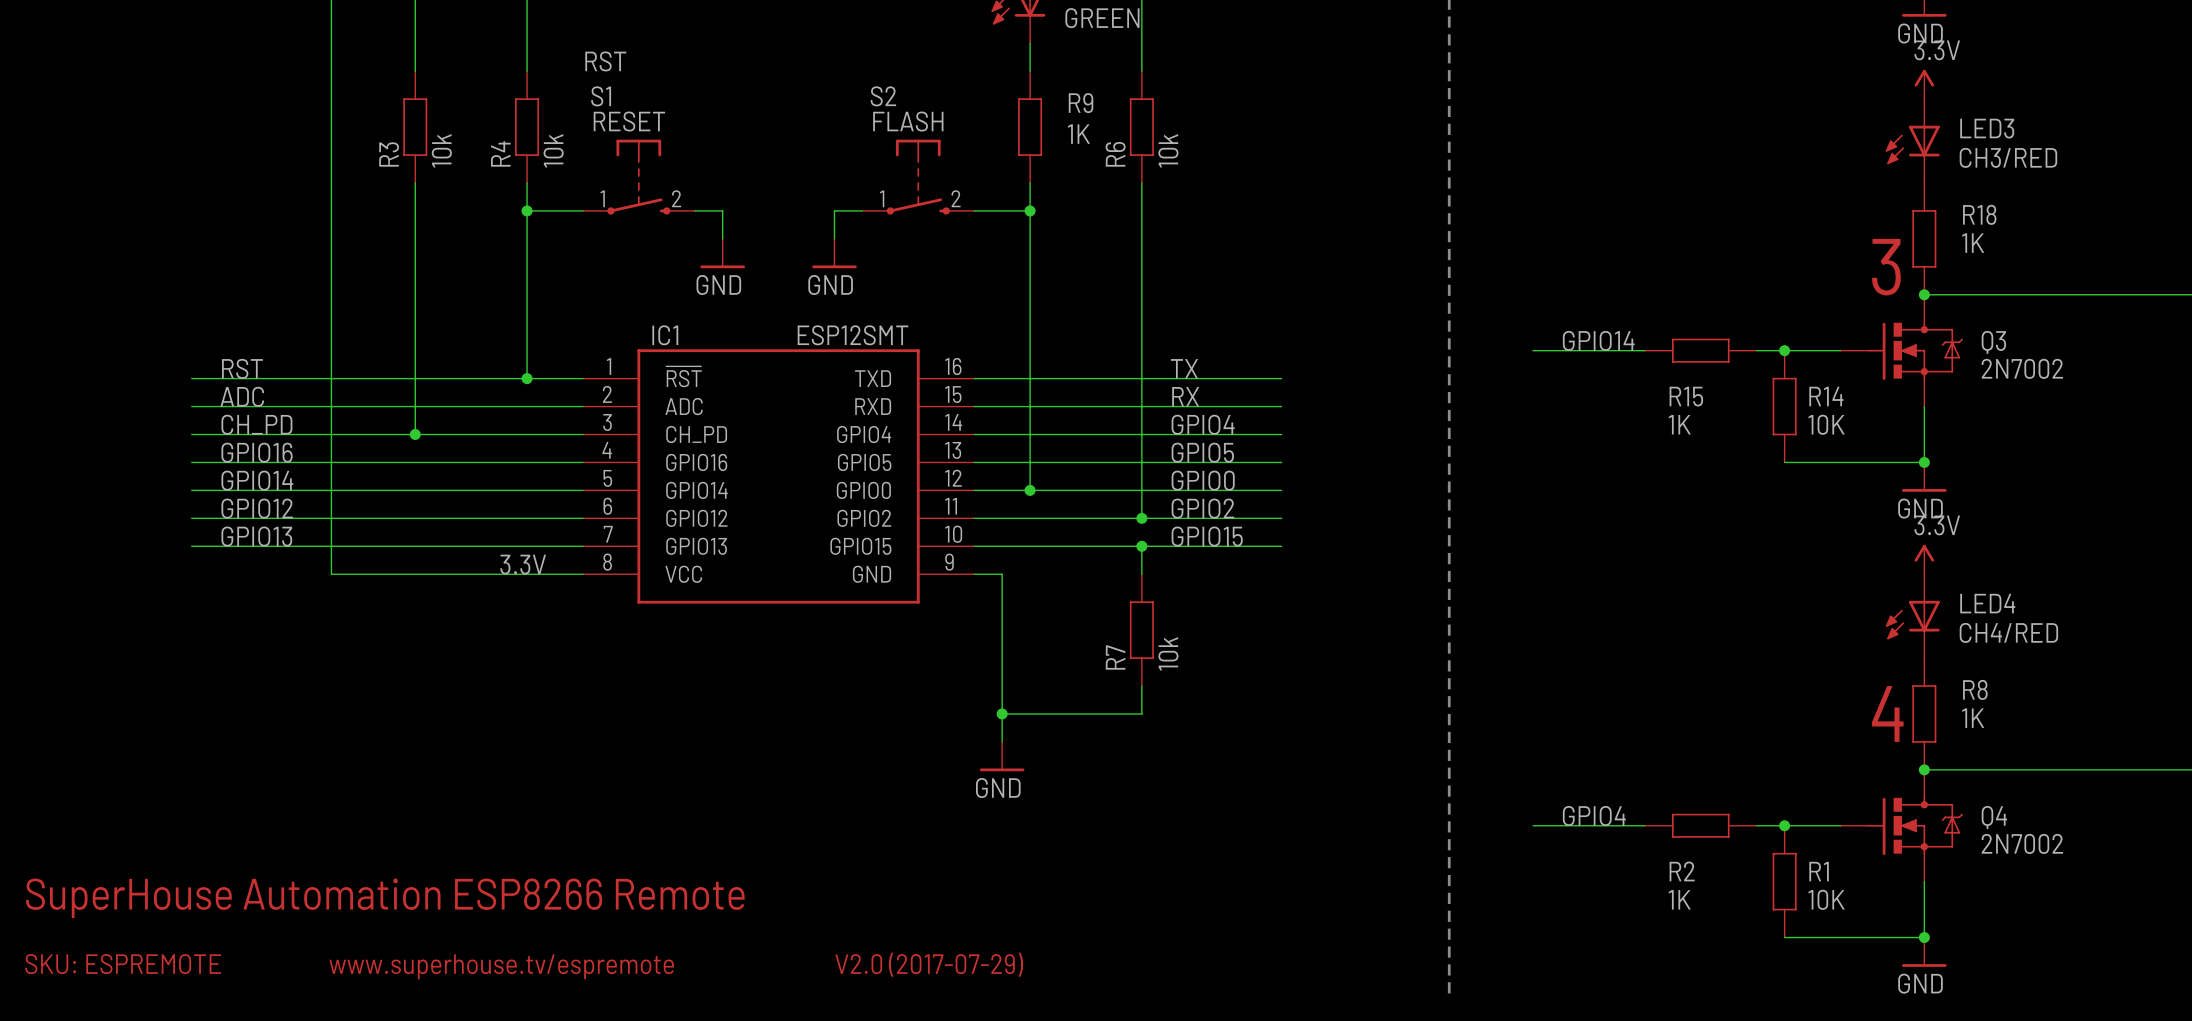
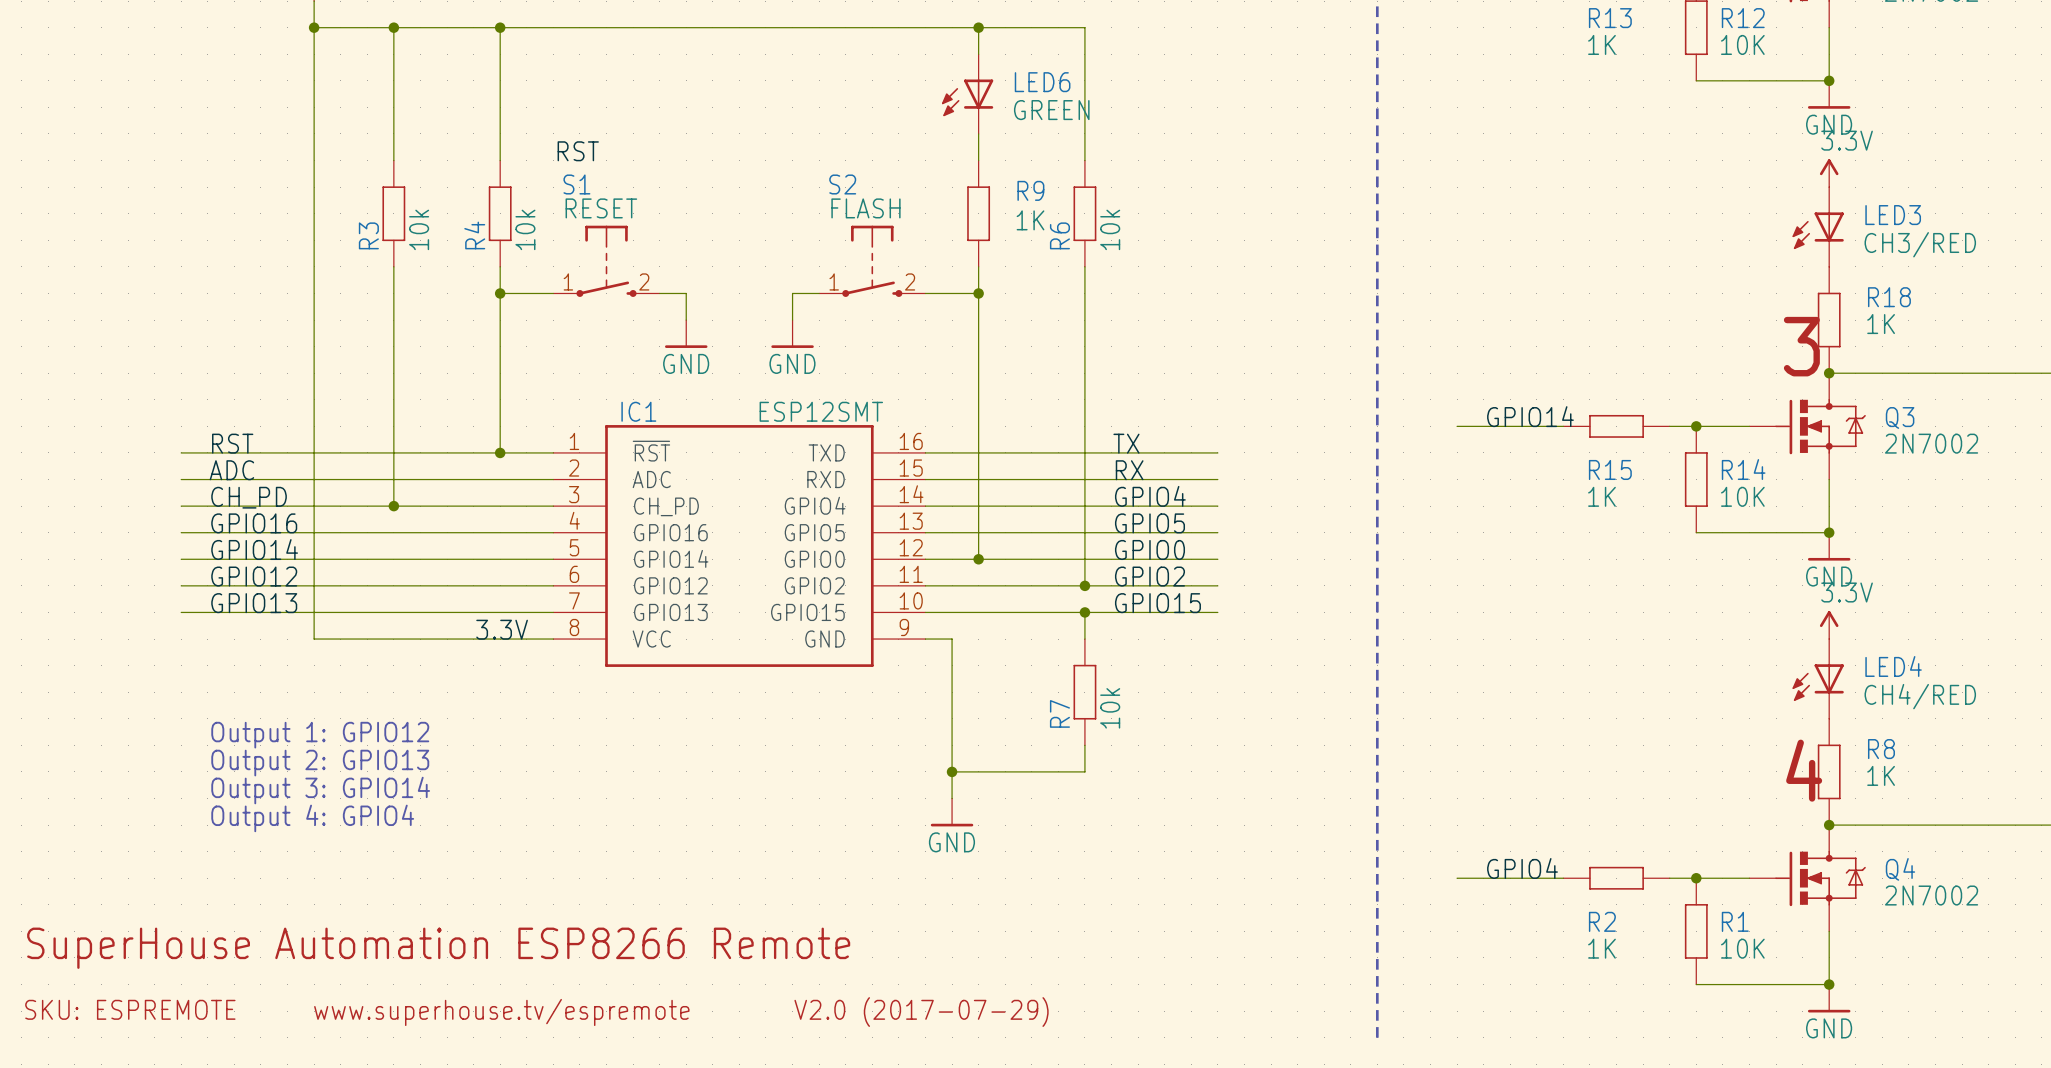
text: none -> Output 1: GPIO12 (320, 735)
text: none -> Output 2: GPIO13 (320, 763)
text: none -> Output 3: GPIO14 (320, 790)
text: none -> Output 4: GPIO4 (312, 818)

